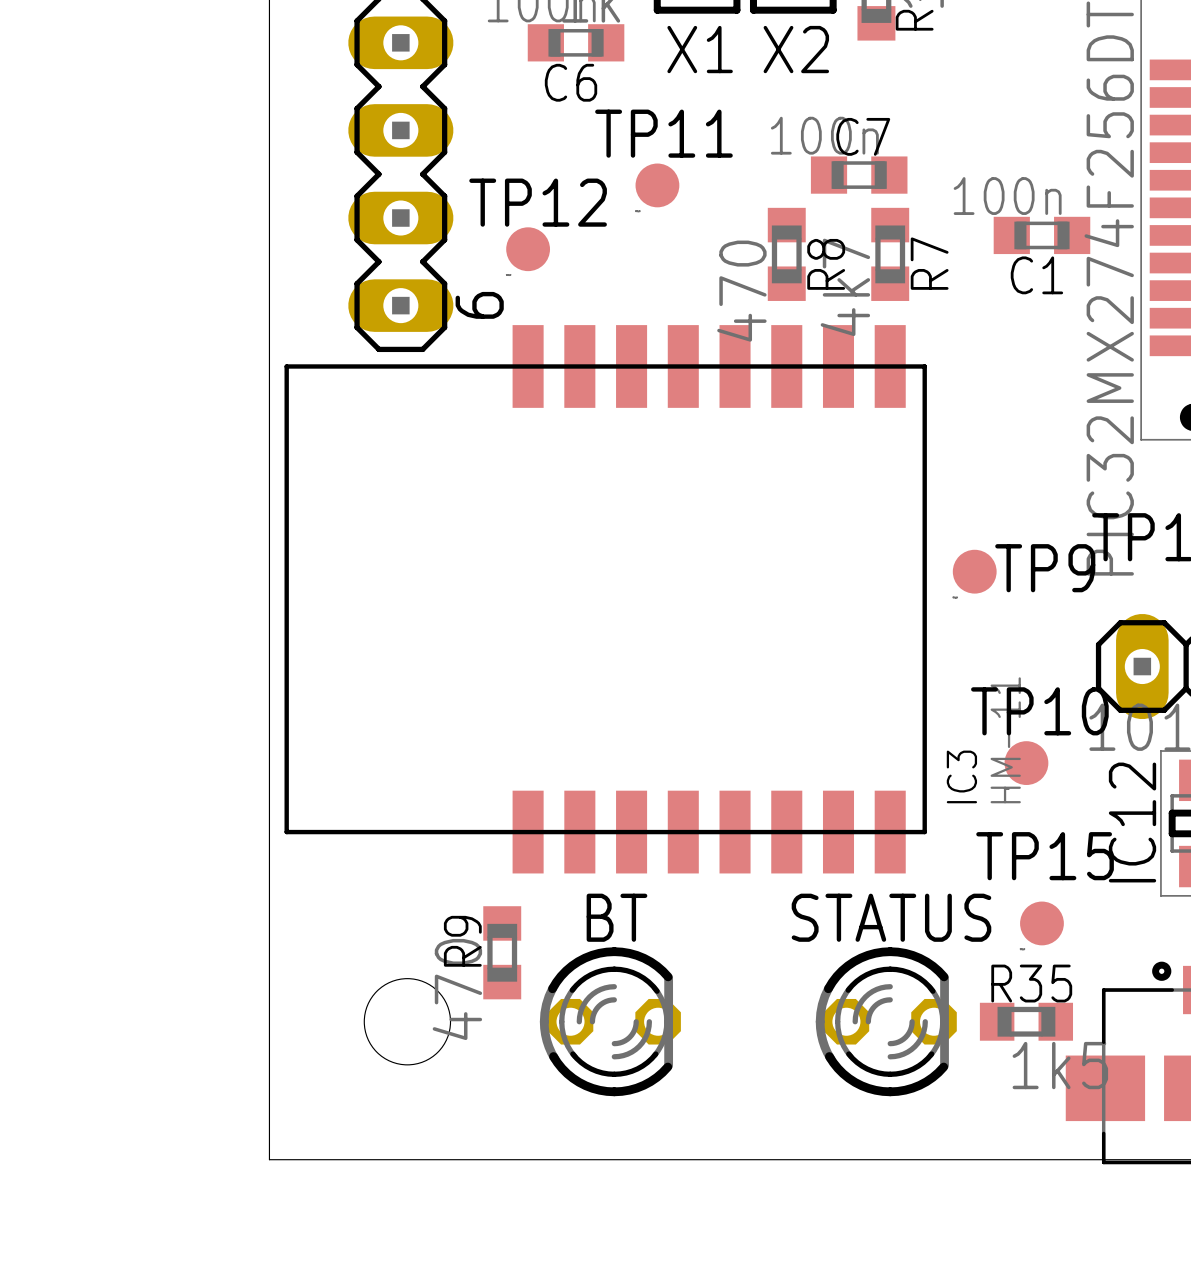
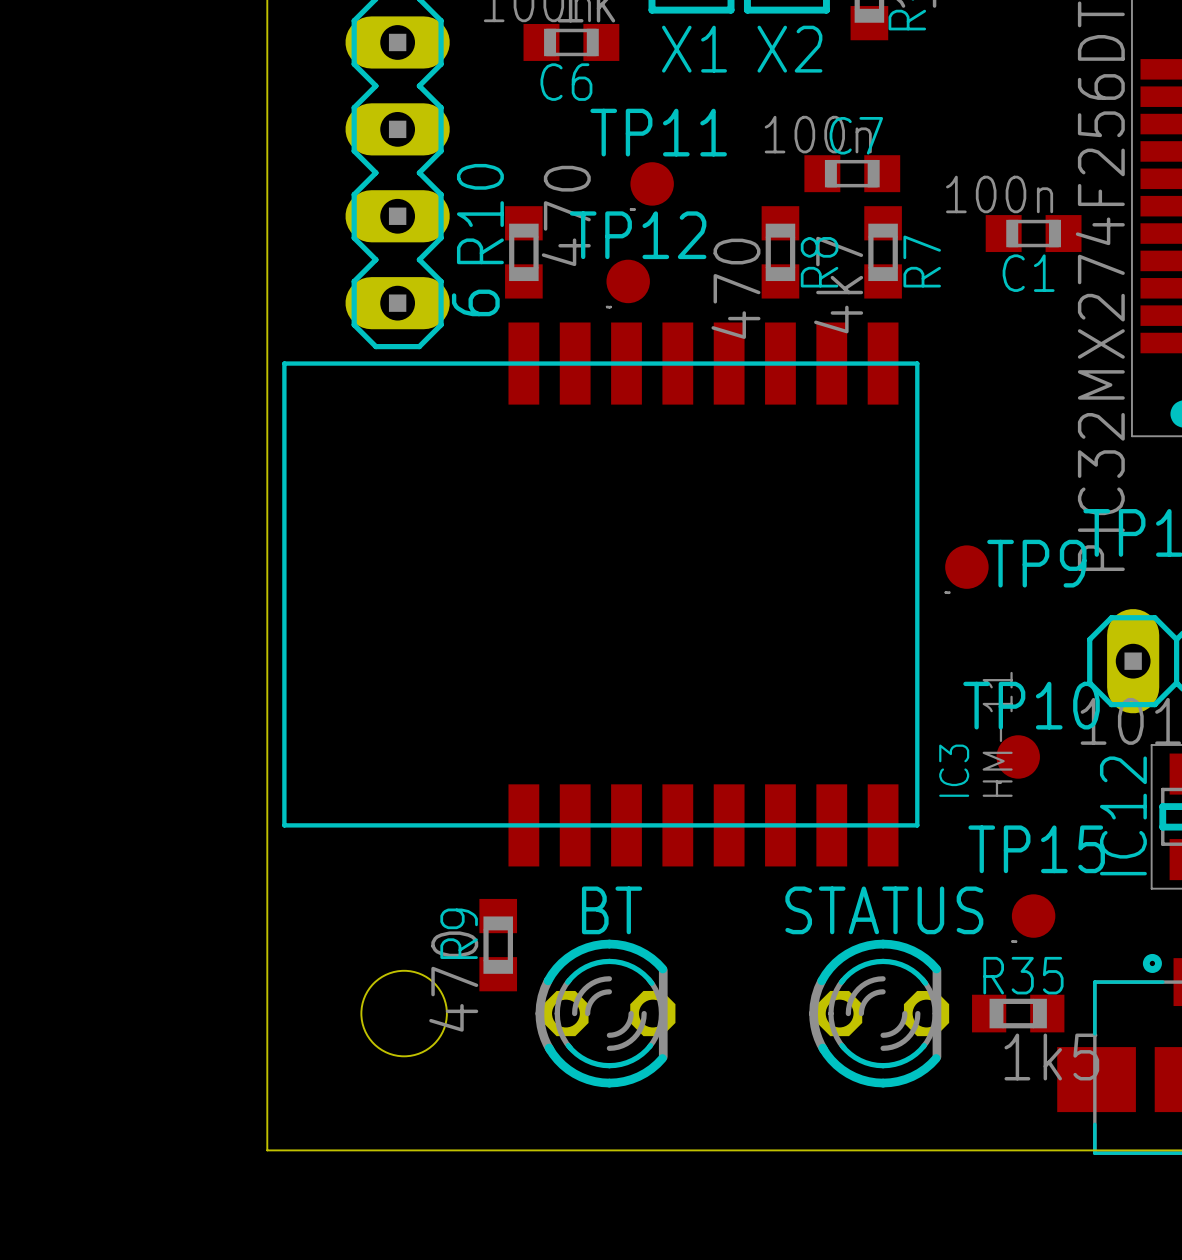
TP12 position: (528, 249) -> (628, 281)
R10: none -> 470 (523, 252)

